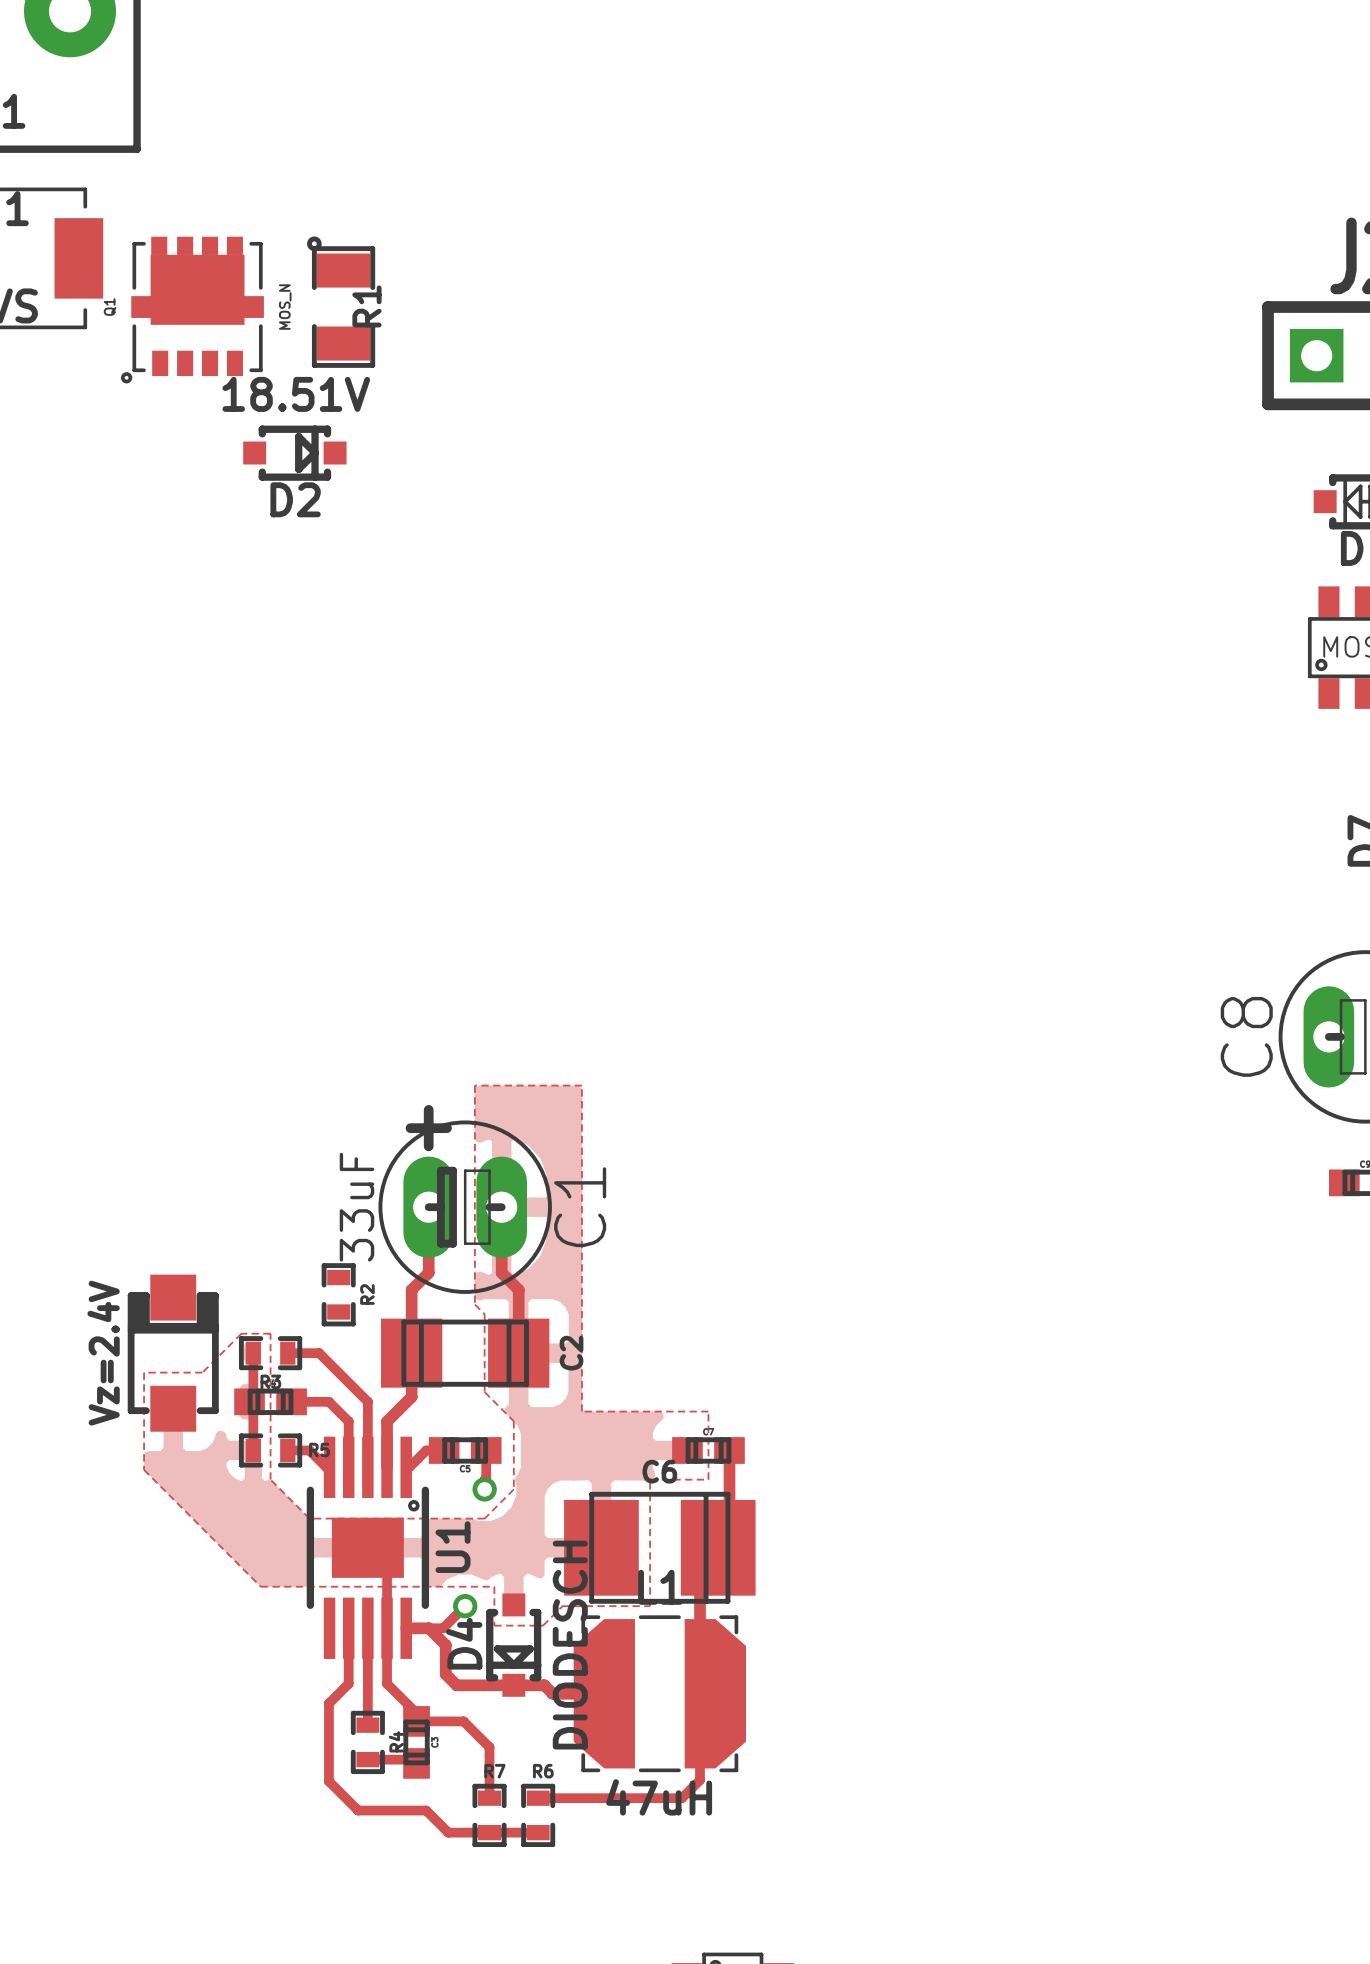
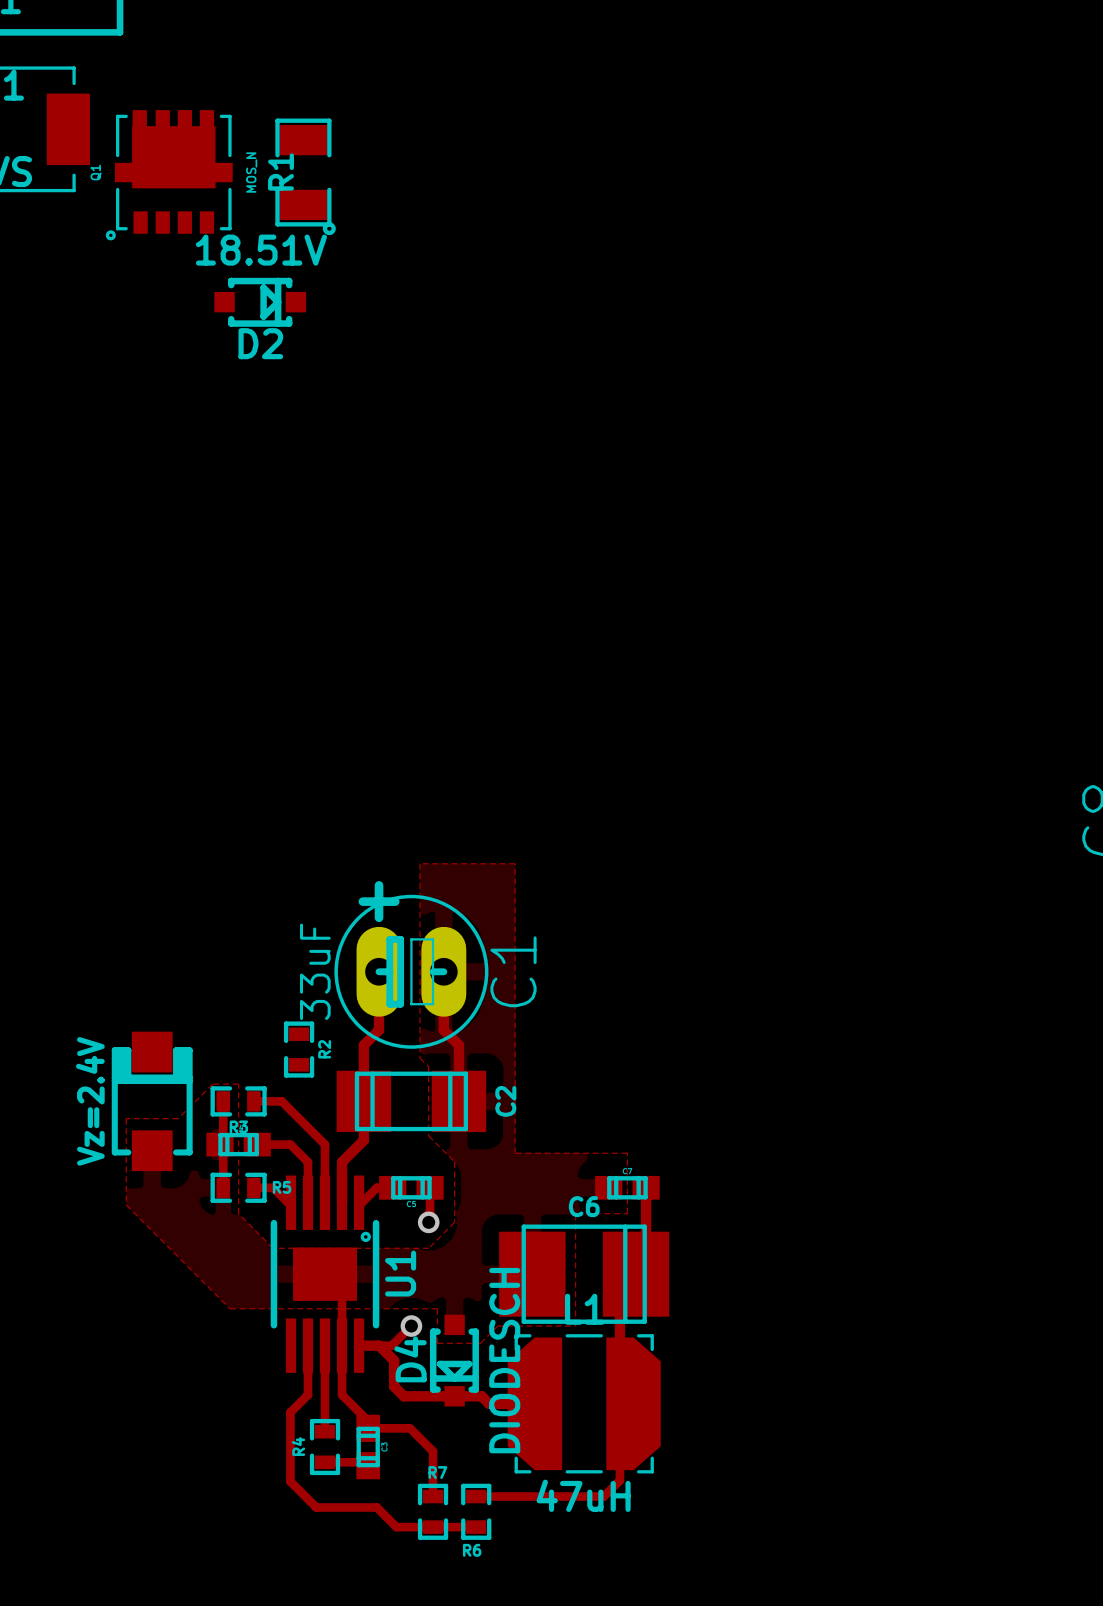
R1 rotation: 0° (341, 302) -> 180° (305, 176)
R4 name position: R4 (396, 1741) -> R4 (298, 1446)
R6 name position: R6 (543, 1771) -> R6 (472, 1550)

